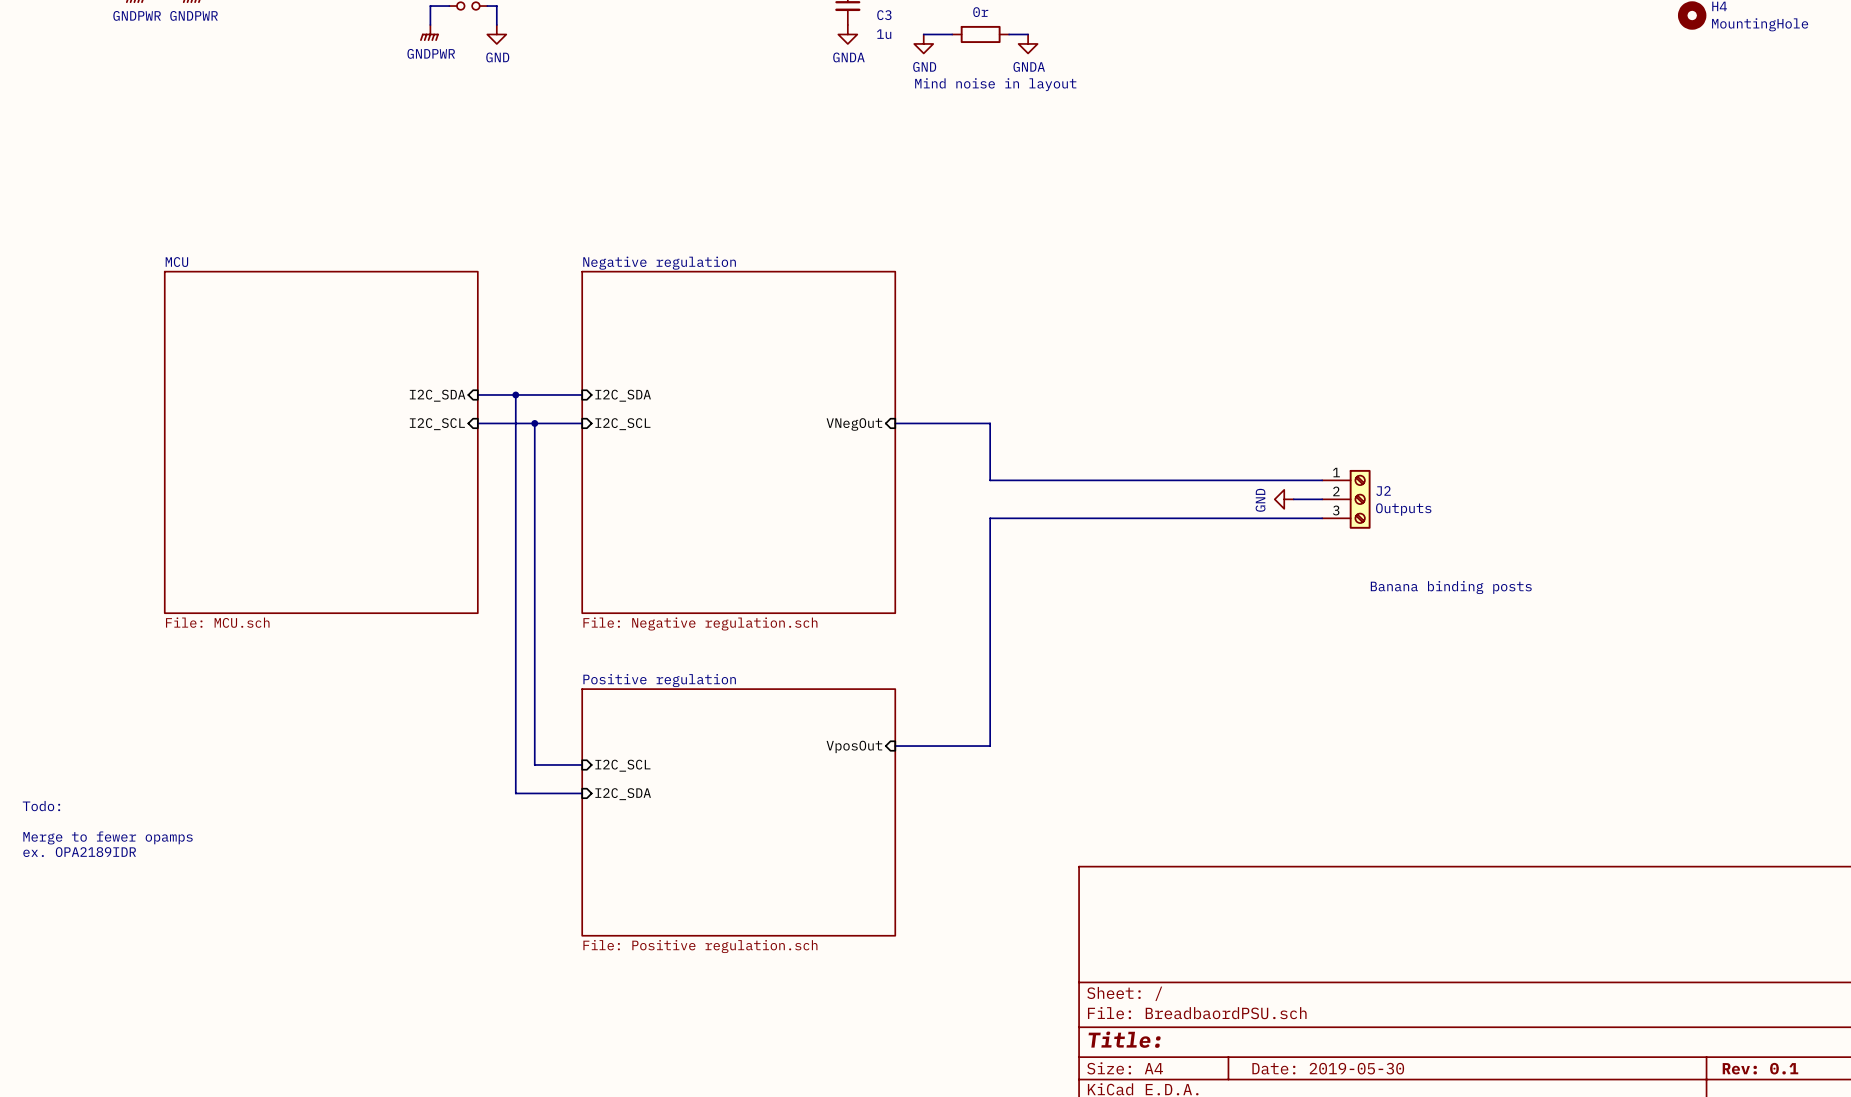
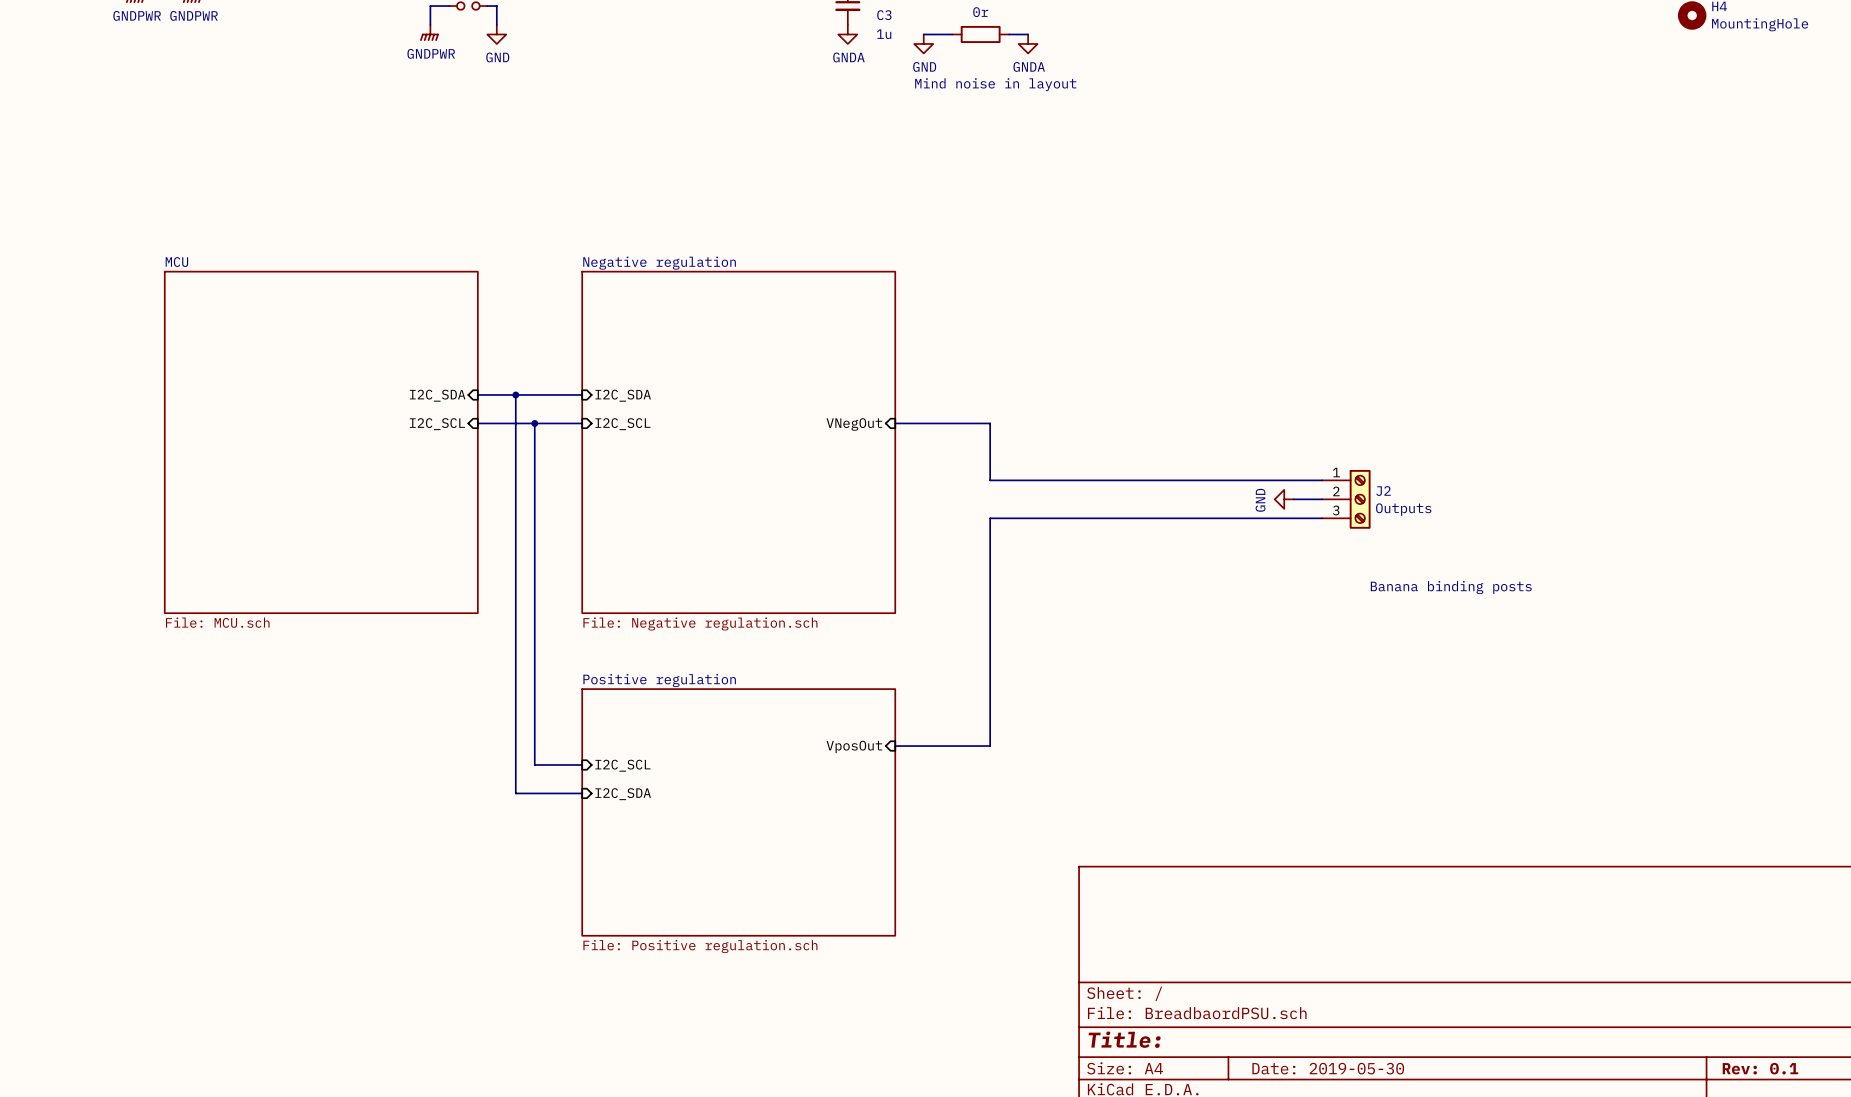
text: Todo: (41, 806) -> none
text: Merge to fewer opamps (108, 837) -> none
text: ex. OPA2189IDR (79, 852) -> none

